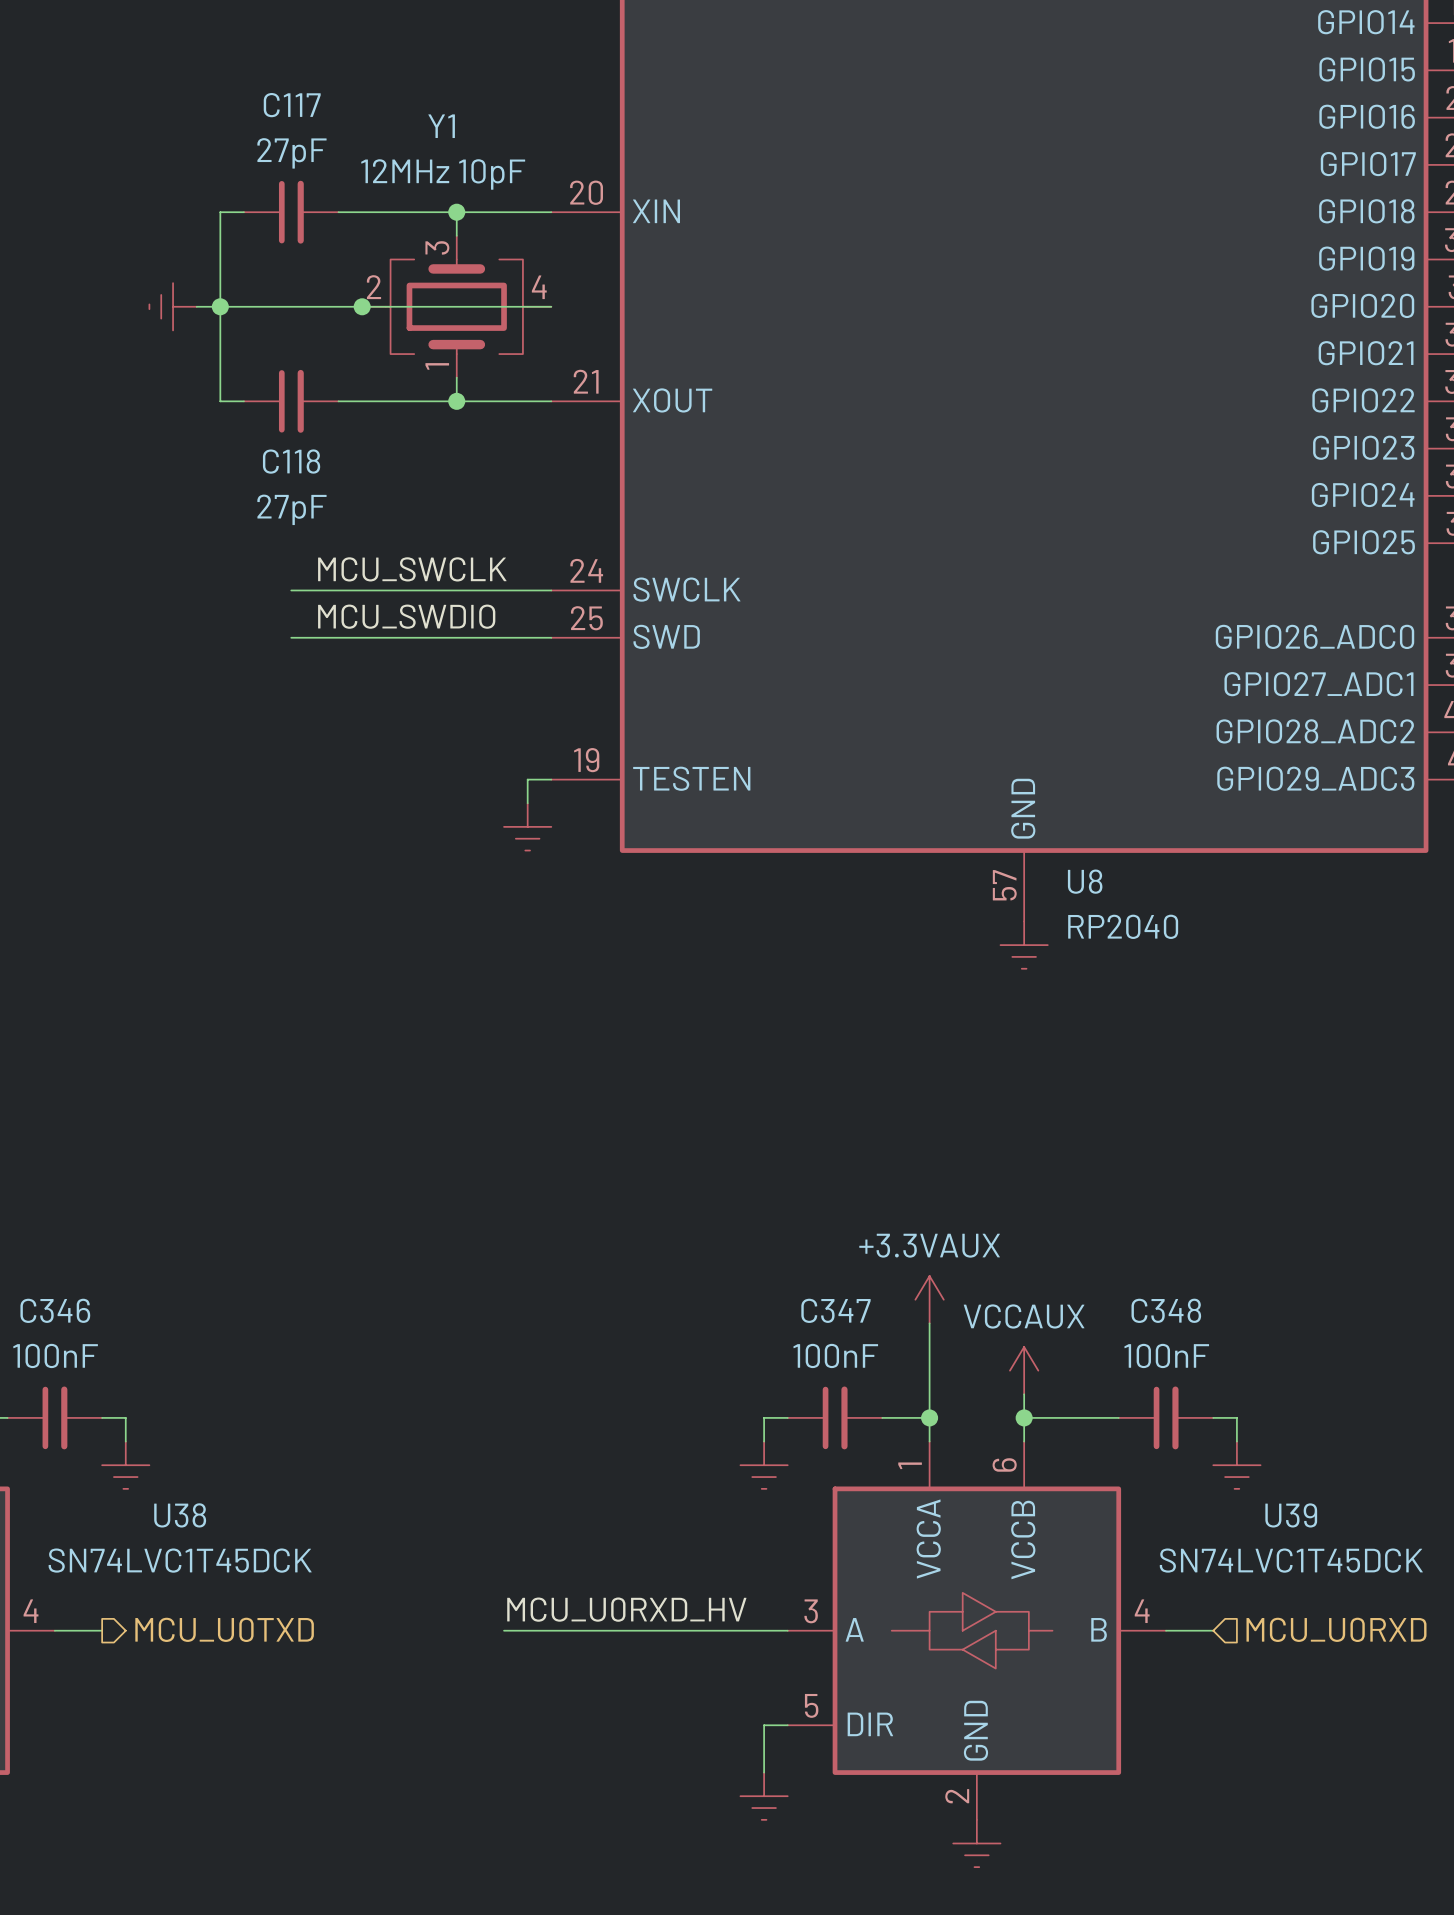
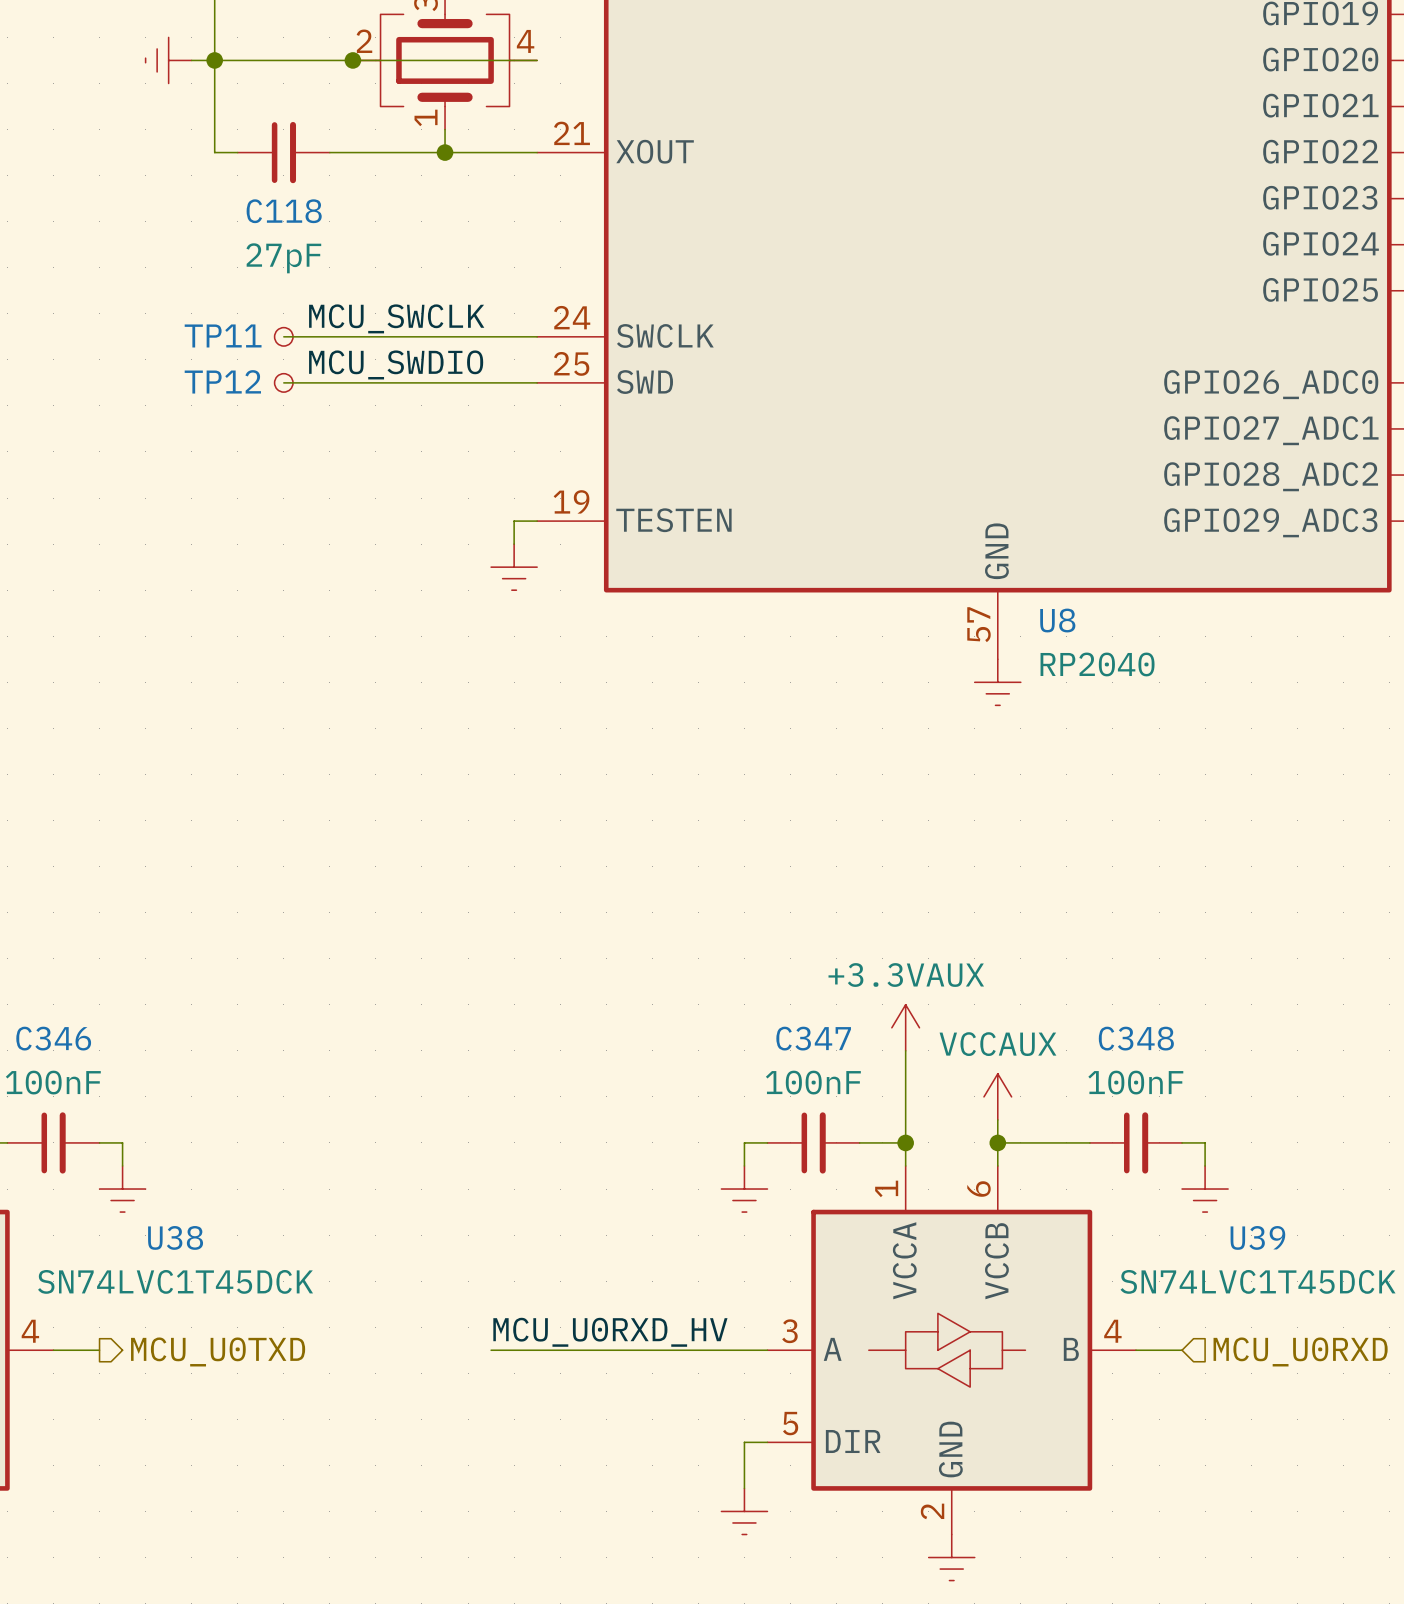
TP11: none -> (283, 336)
TP12: none -> (283, 382)

